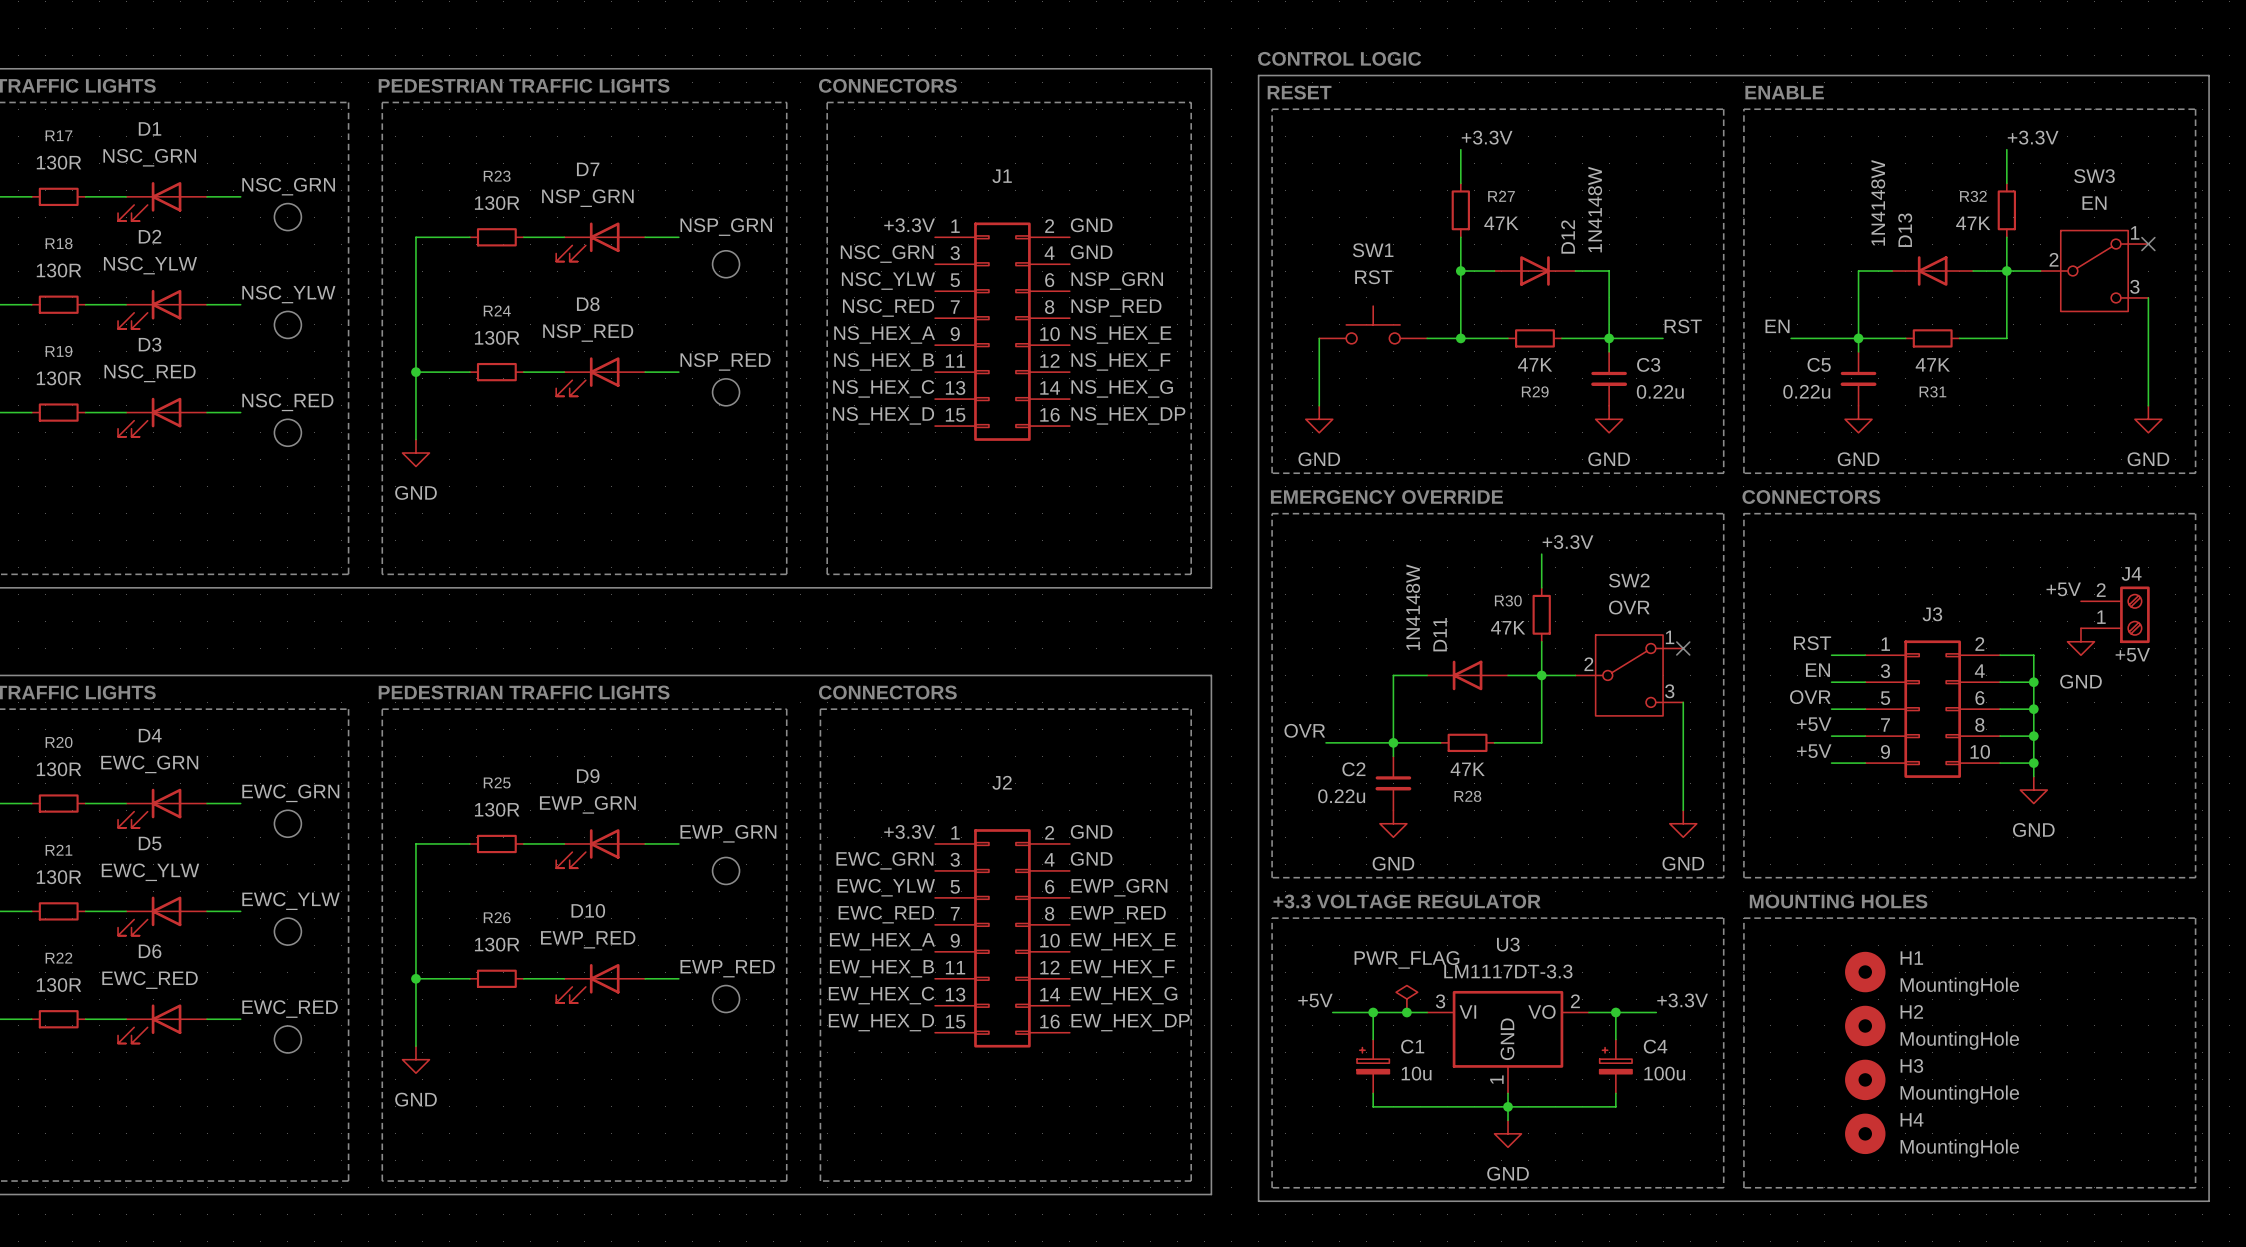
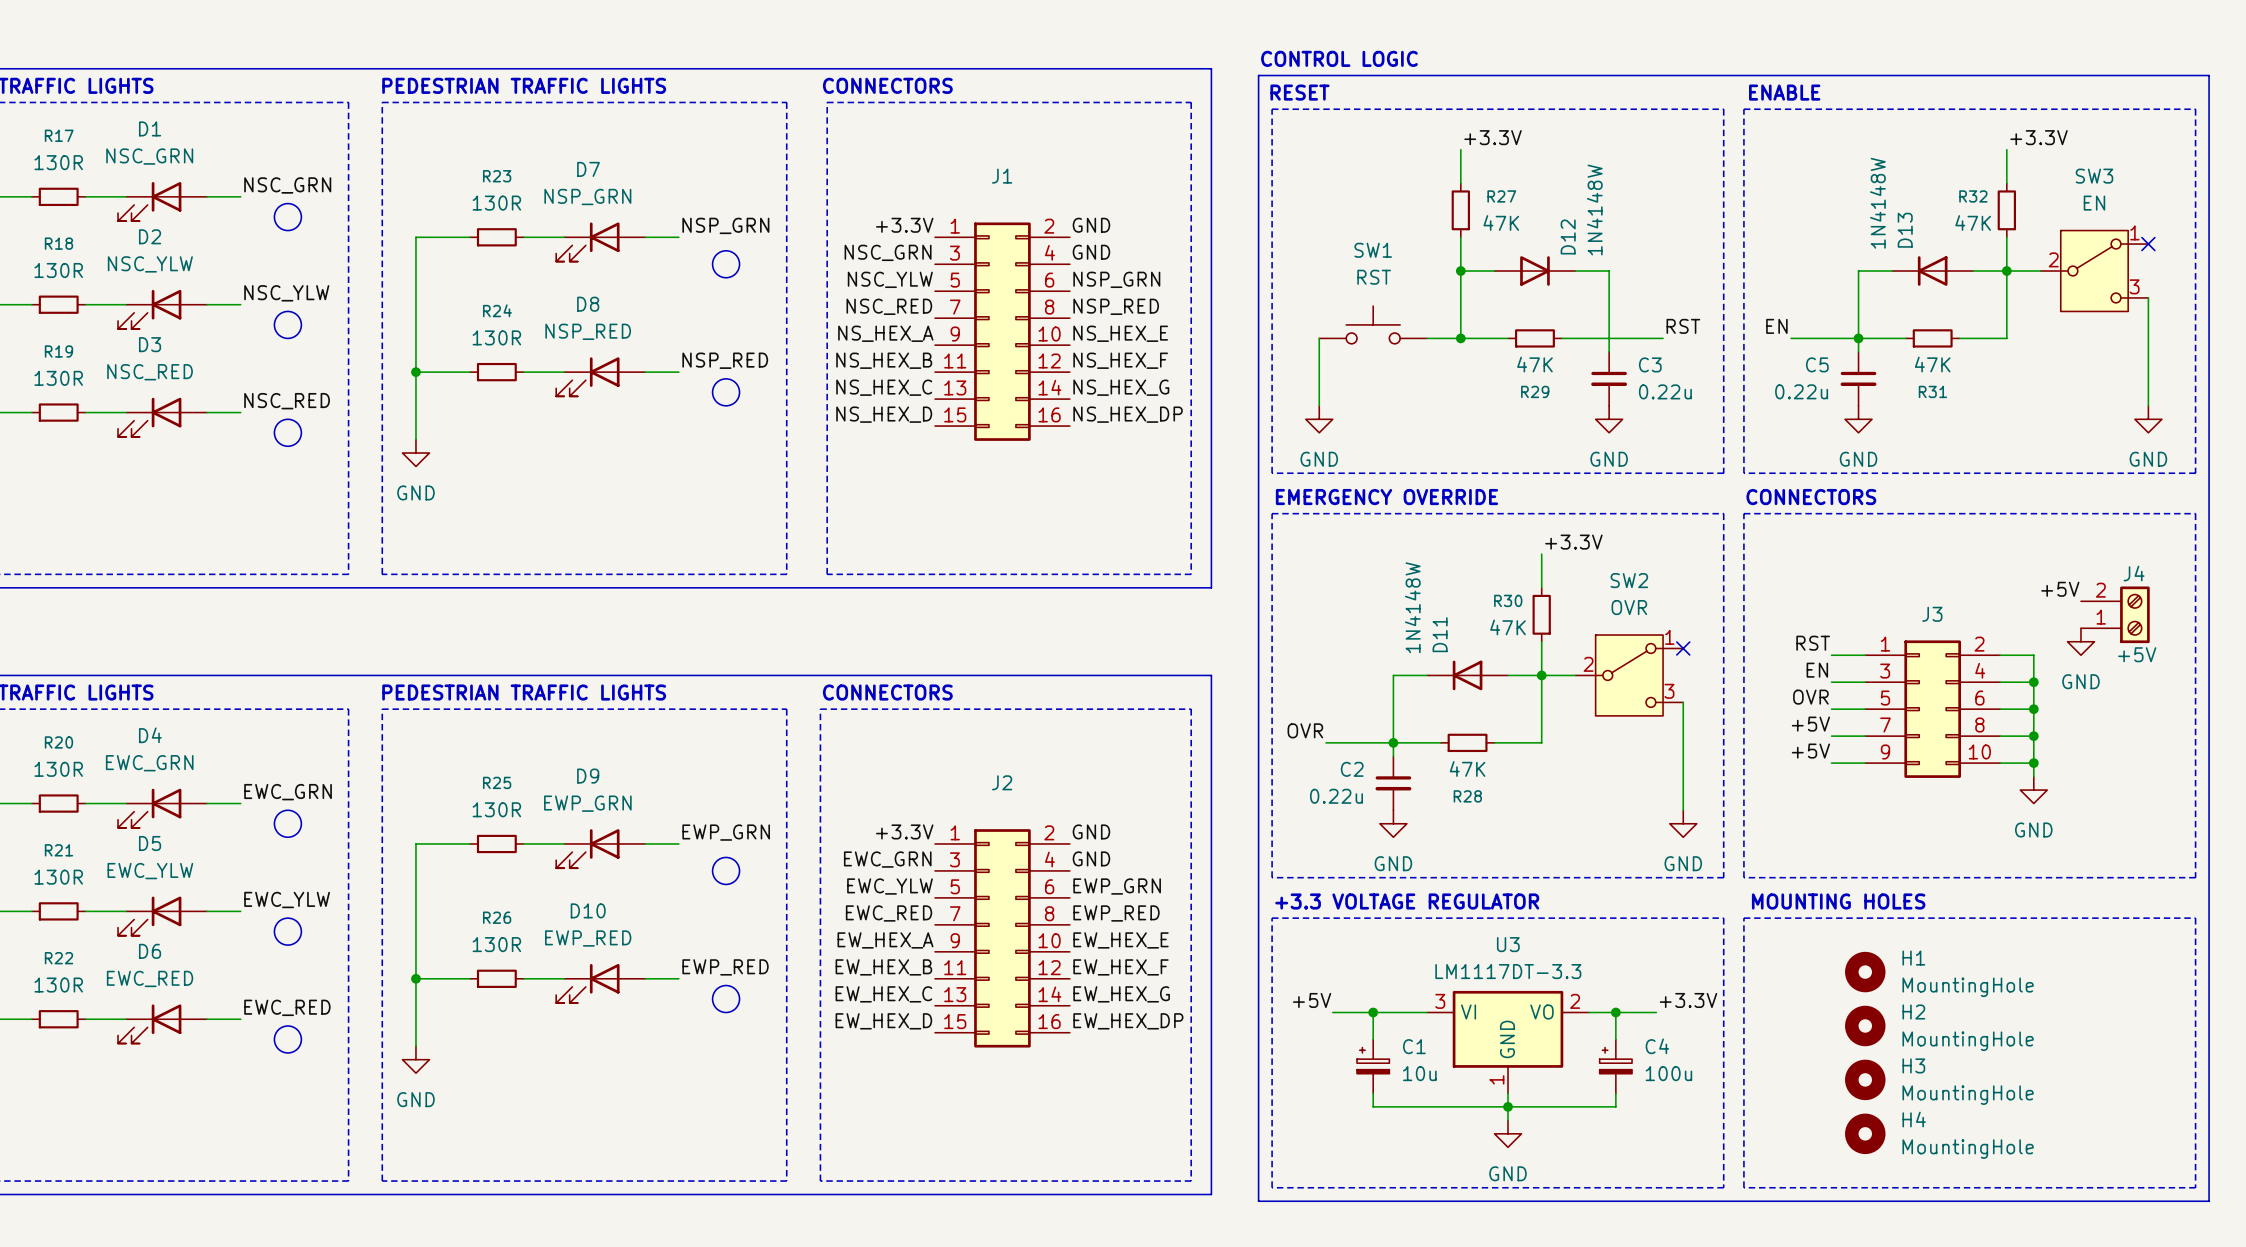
junction: (1609, 338) -> none
power symbol: PWR_FLAG (1406, 999) -> none
junction: (1406, 1012) -> none

